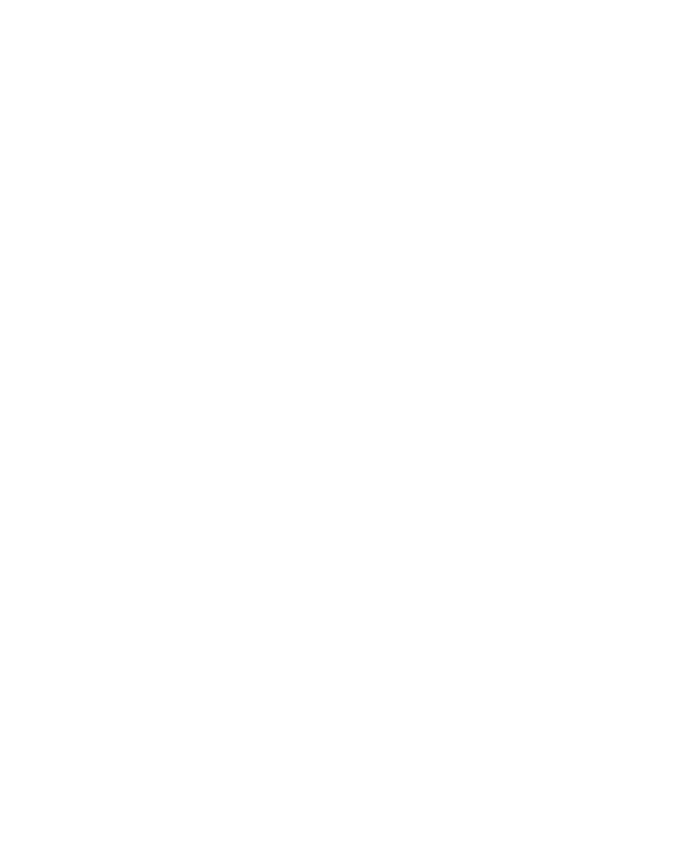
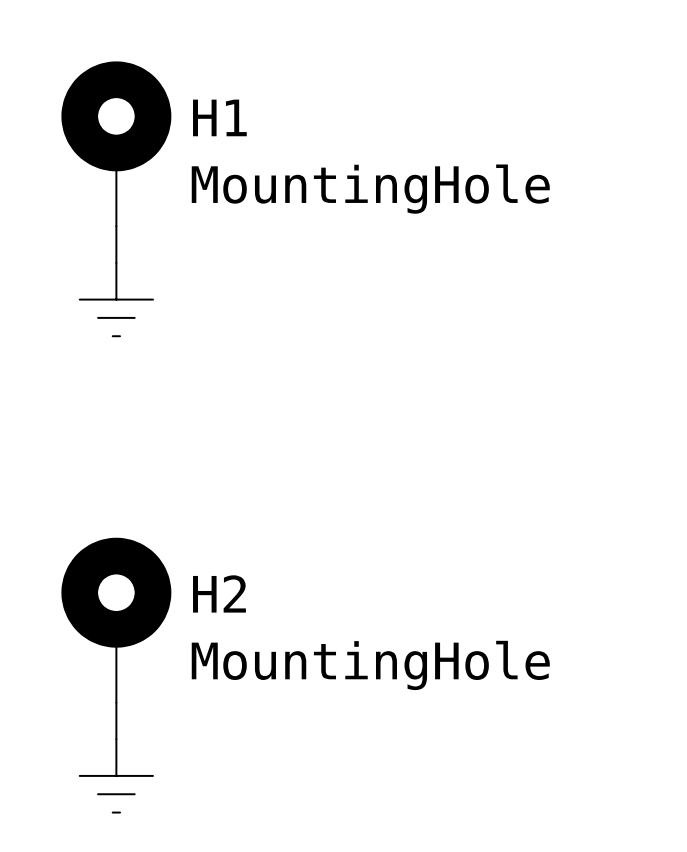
H1: none -> MountingHole (116, 143)
wire: none -> (116, 226) (116, 262)
power symbol: none -> (116, 299)
H2: none -> MountingHole (116, 620)
wire: none -> (116, 702) (116, 739)
power symbol: none -> (116, 775)

